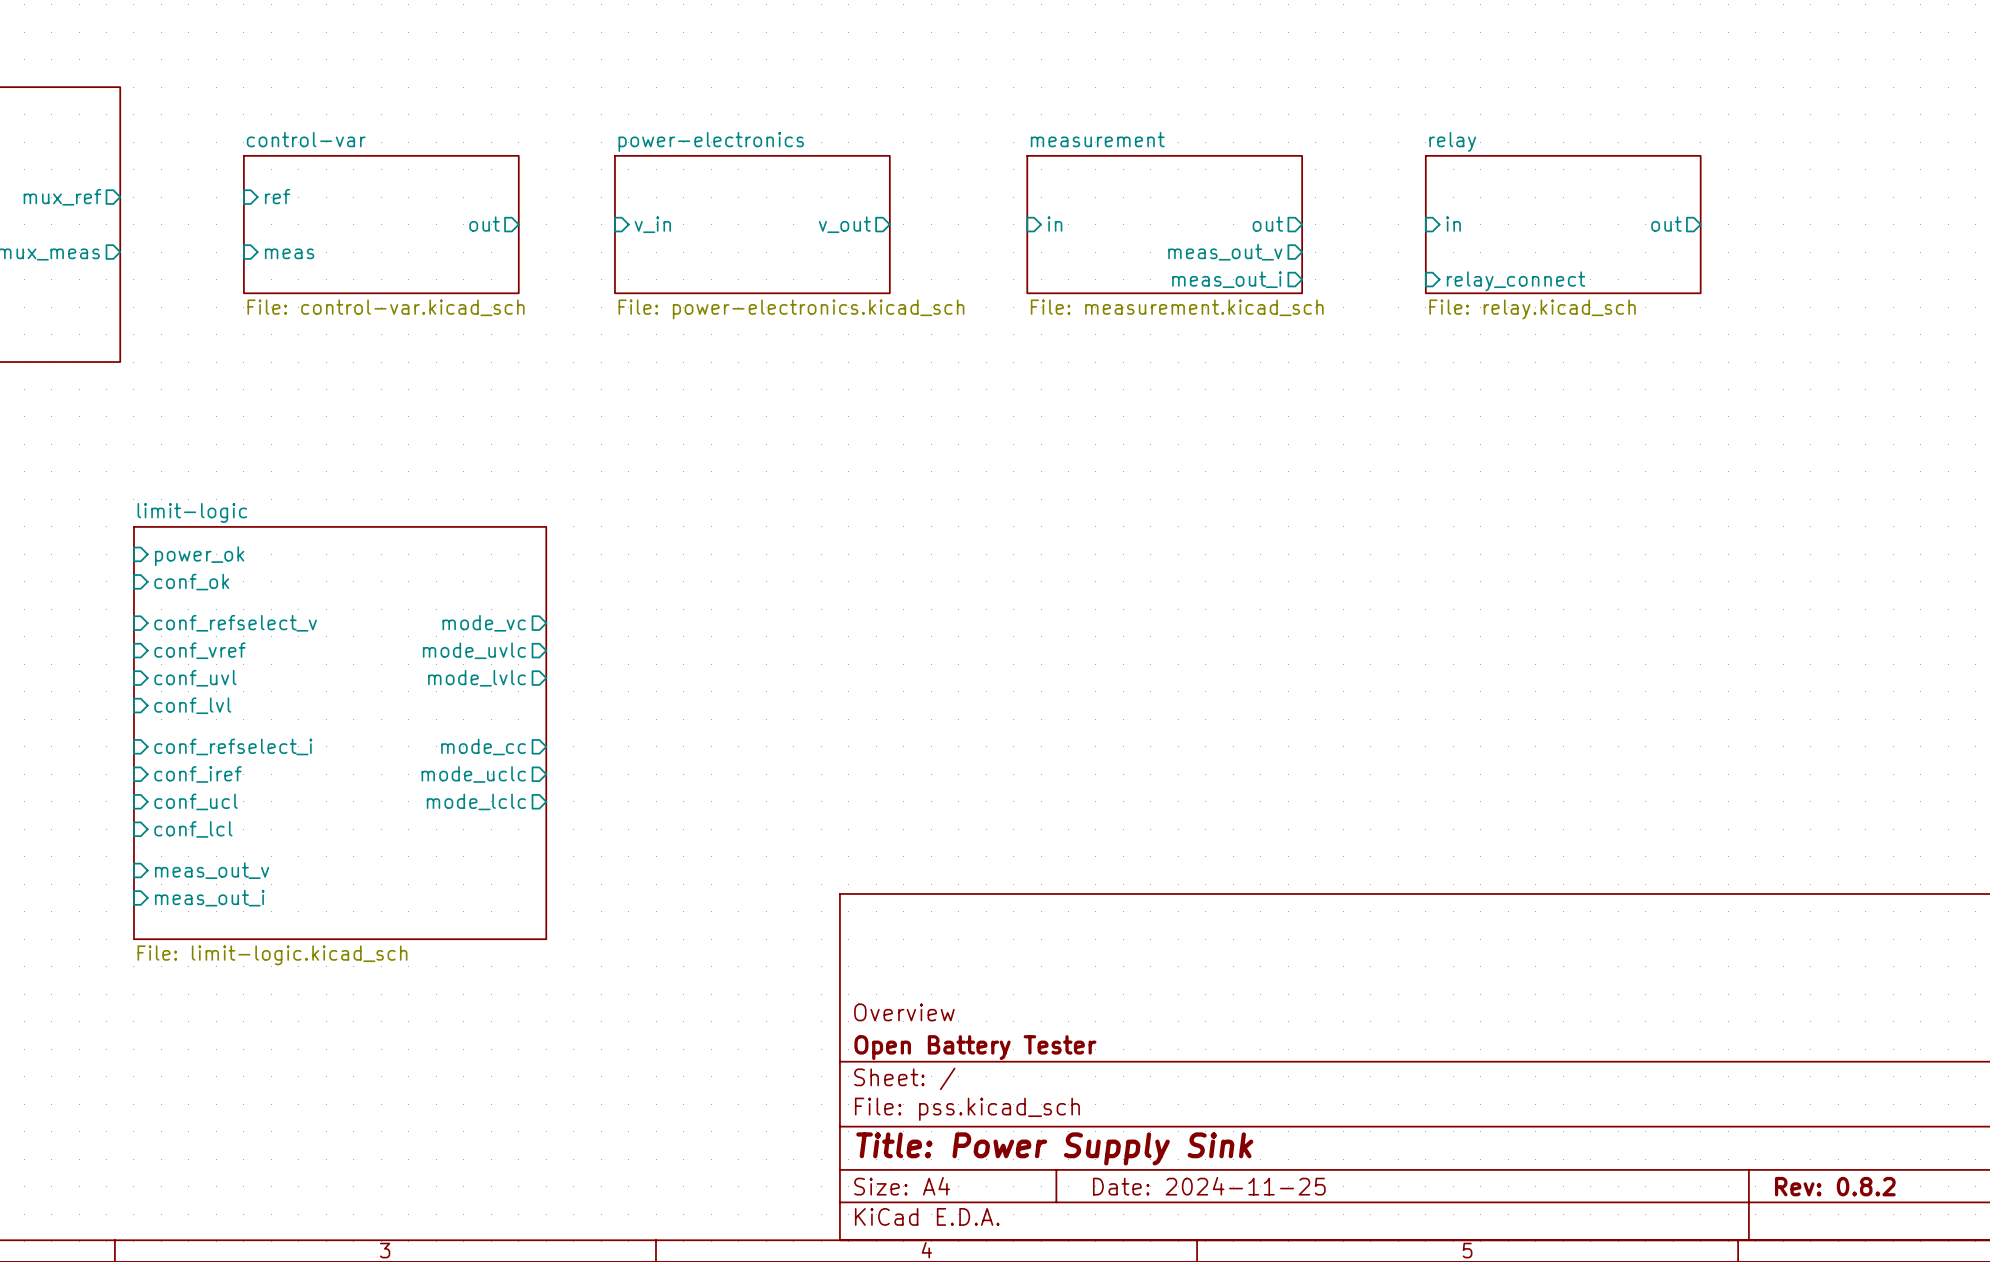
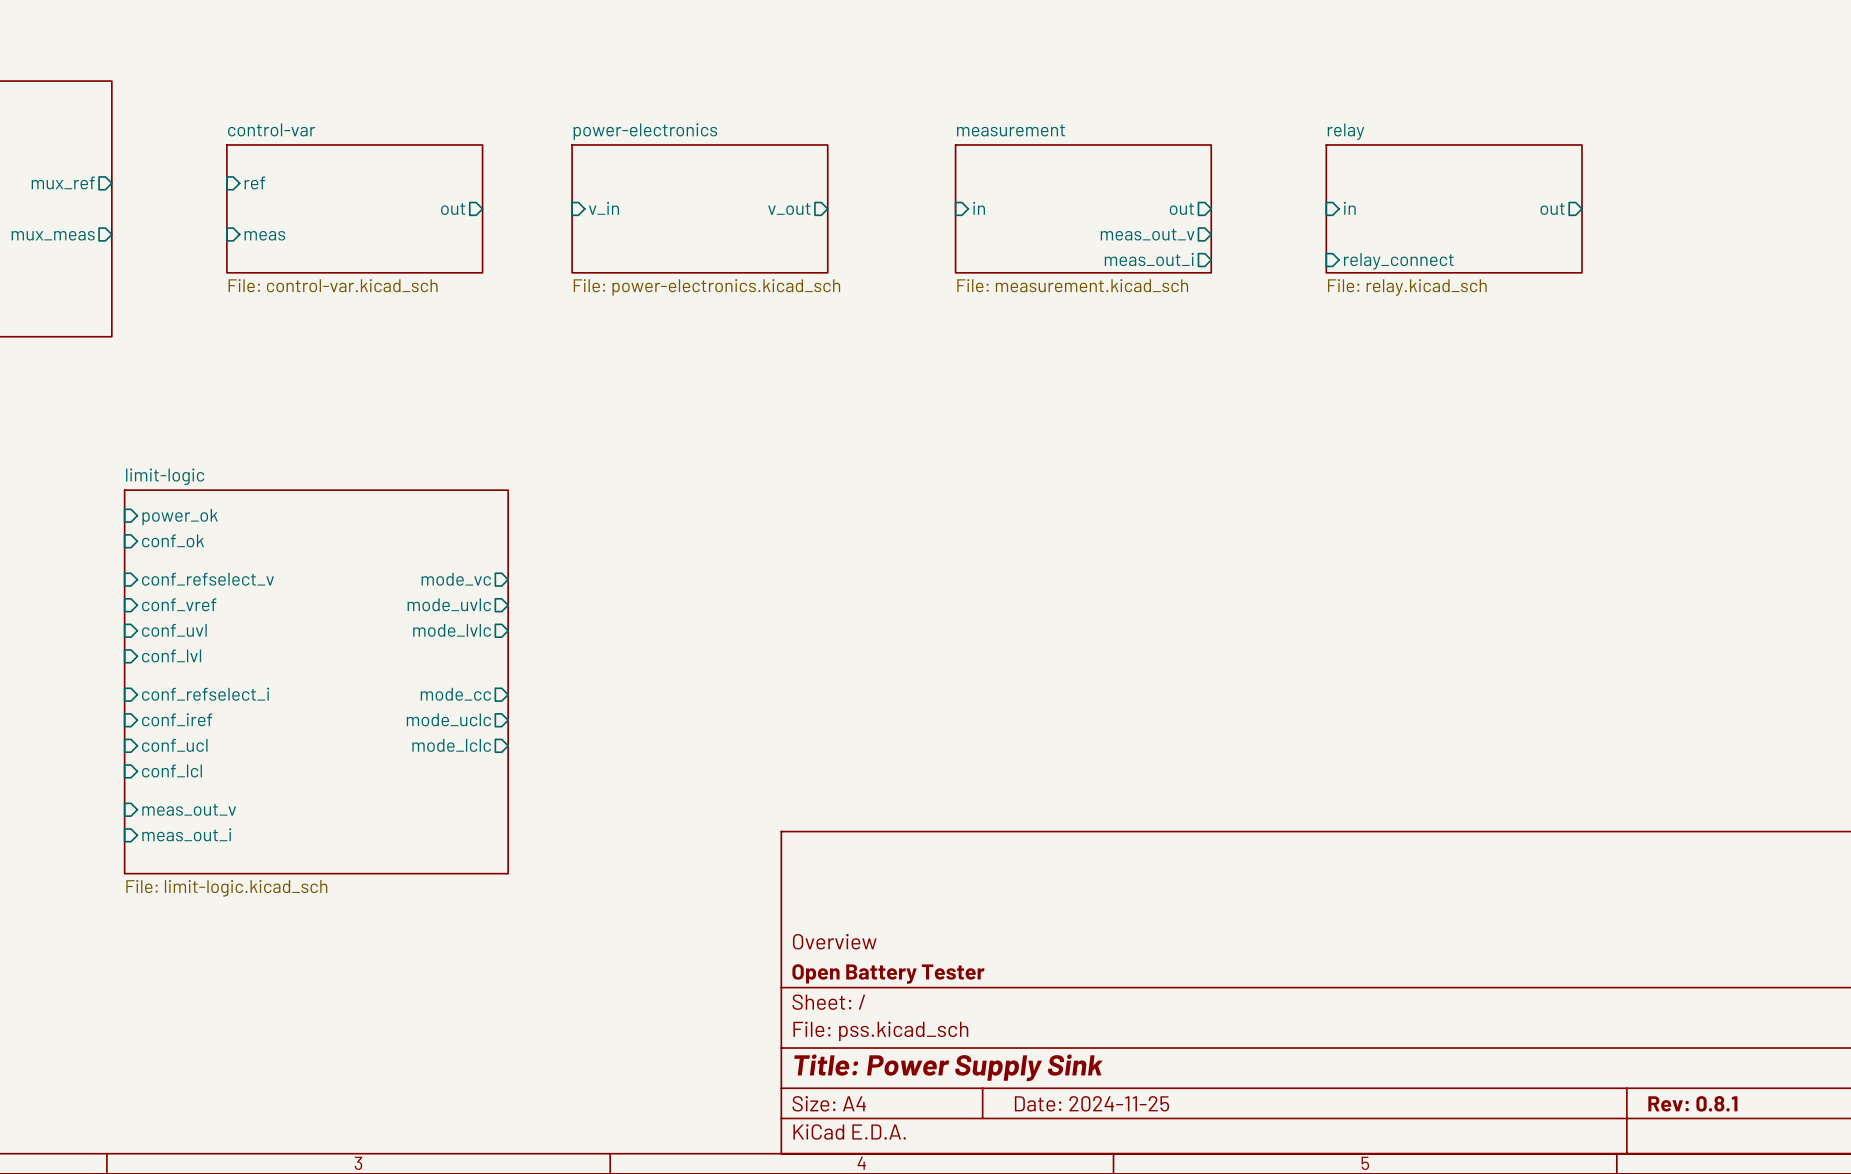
title block: Rev: 0.8.2 (1835, 1186) -> Rev: 0.8.1 (1692, 1103)

